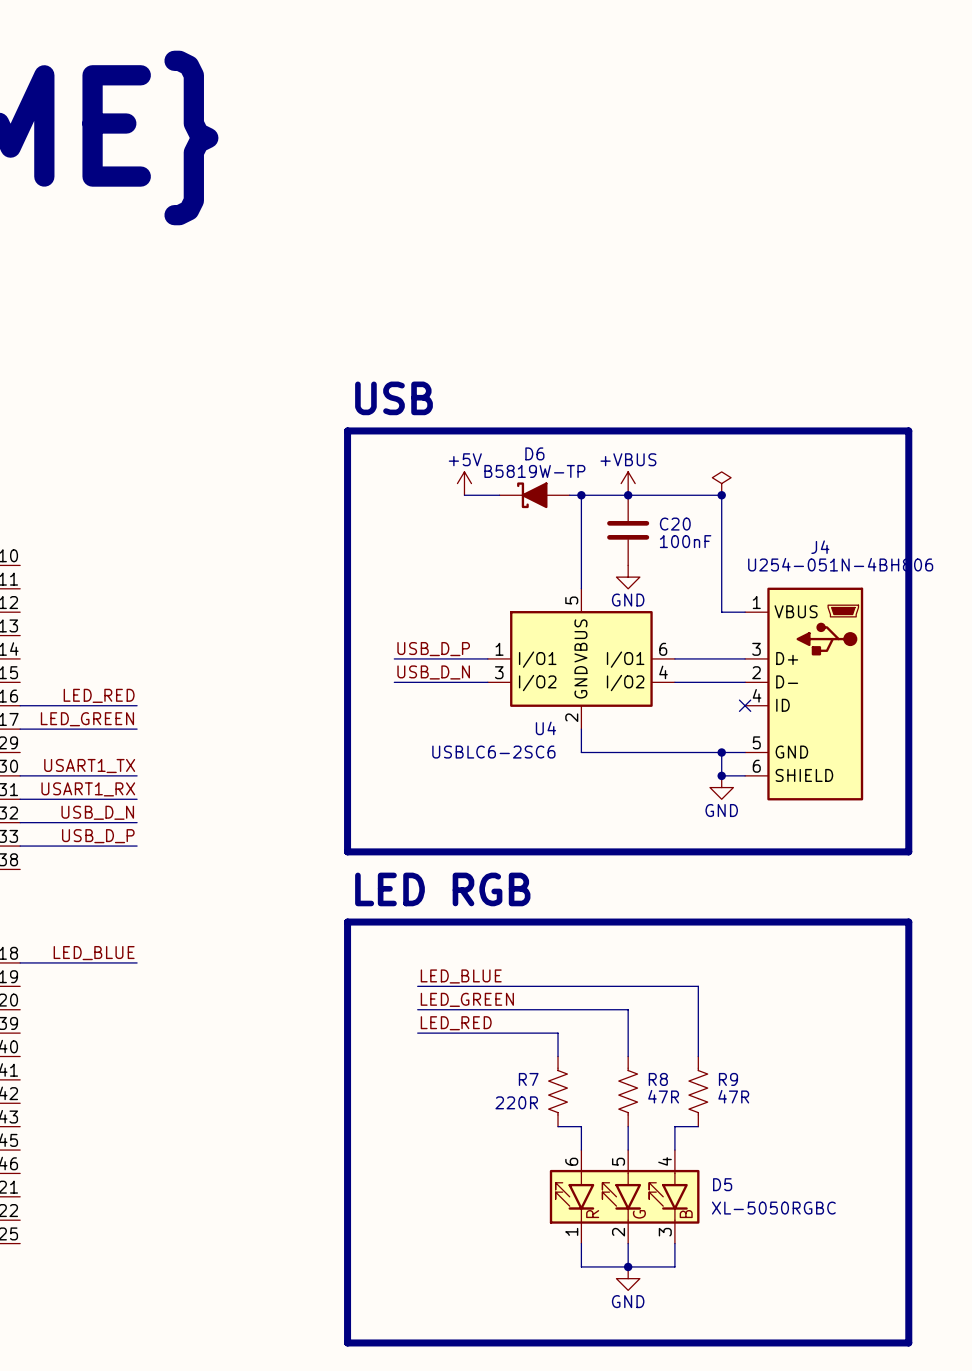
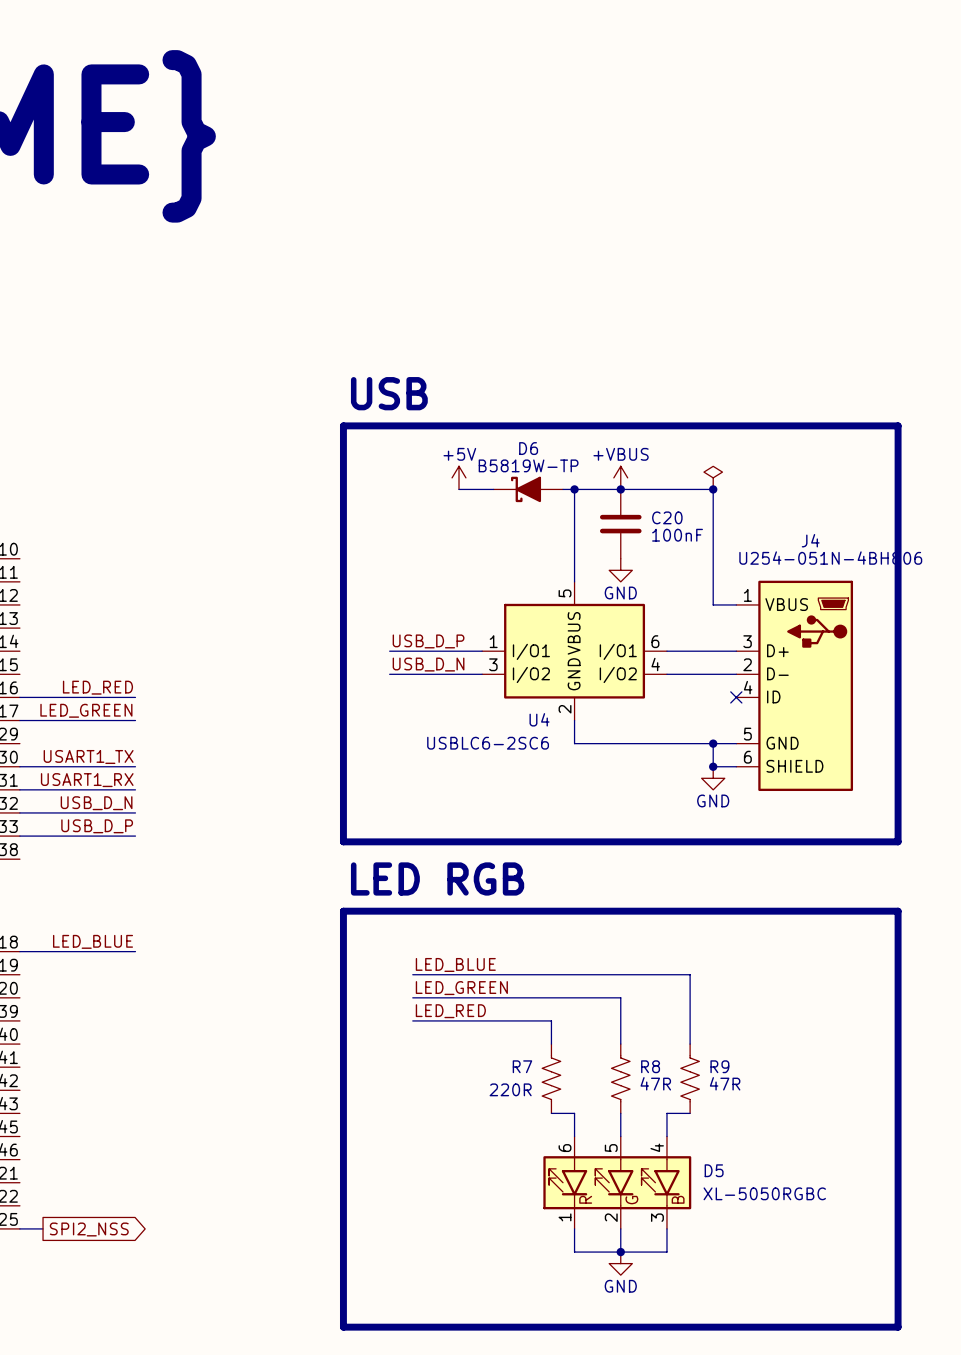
wire: none -> (19, 1228) (43, 1228)
global label: none -> SPI2_NSS (89, 1229)

